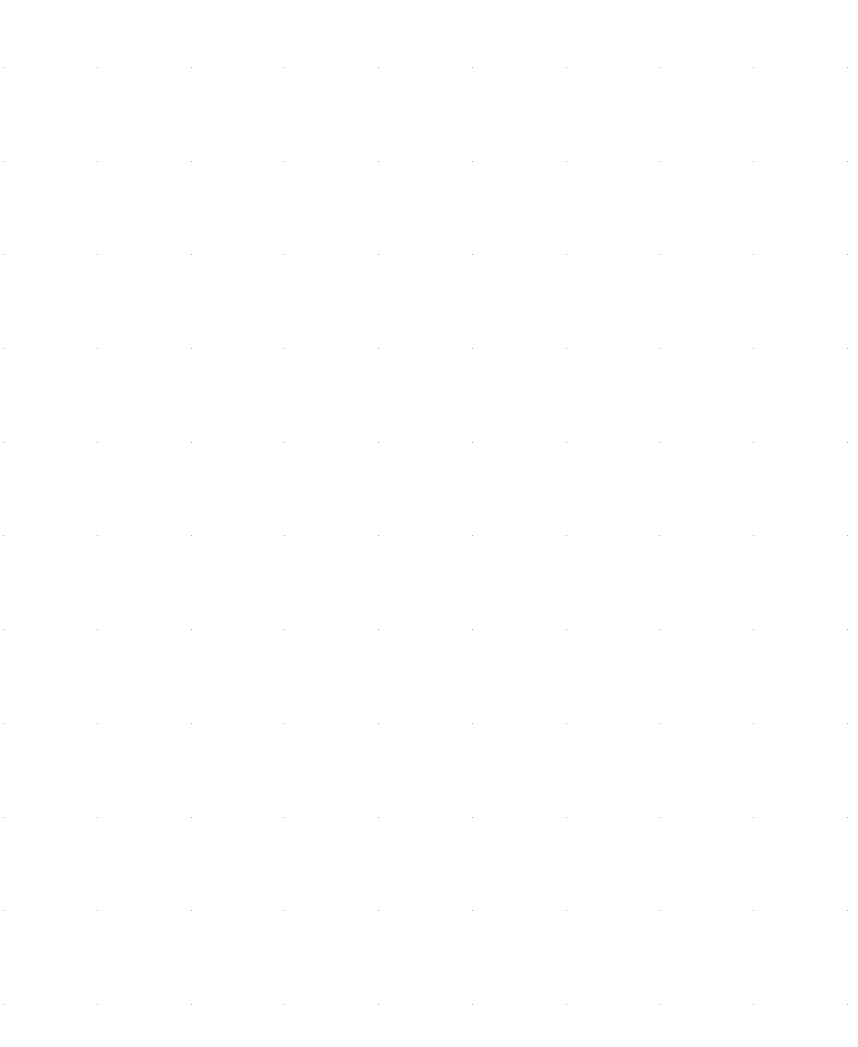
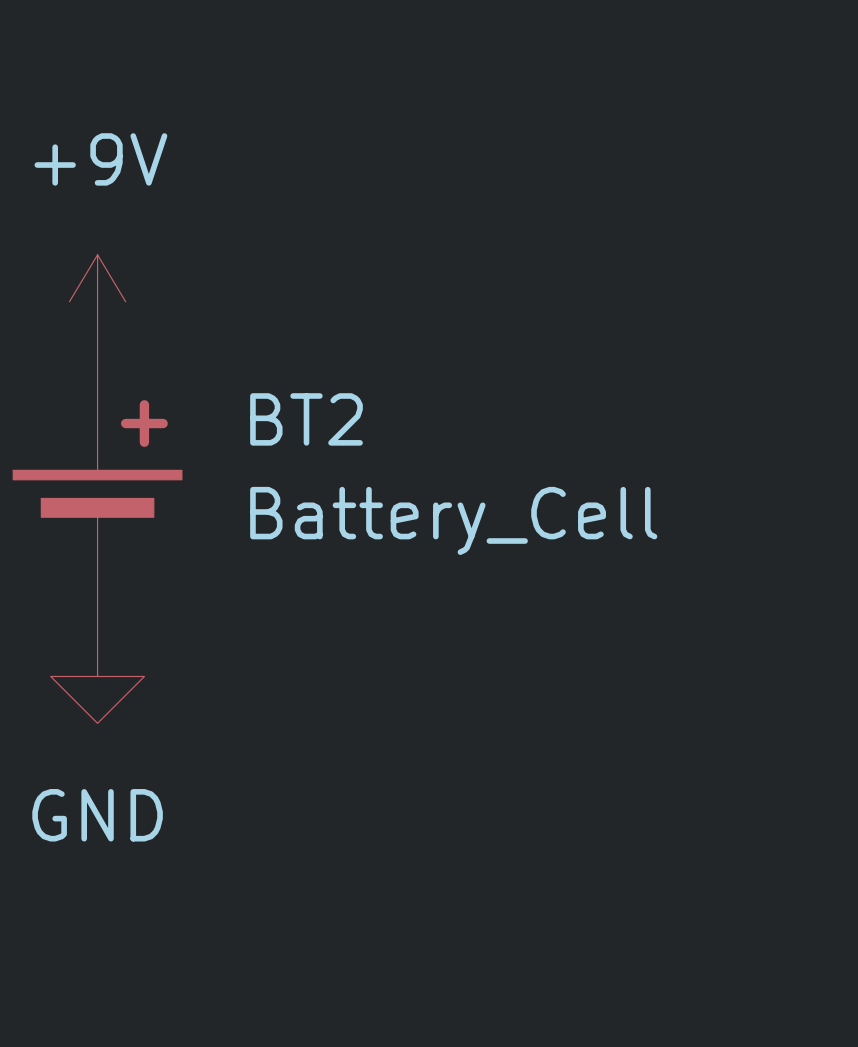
power symbol: none -> +9V (97, 301)
BT2: none -> Battery_Cell (97, 489)
power symbol: none -> GND (97, 676)

